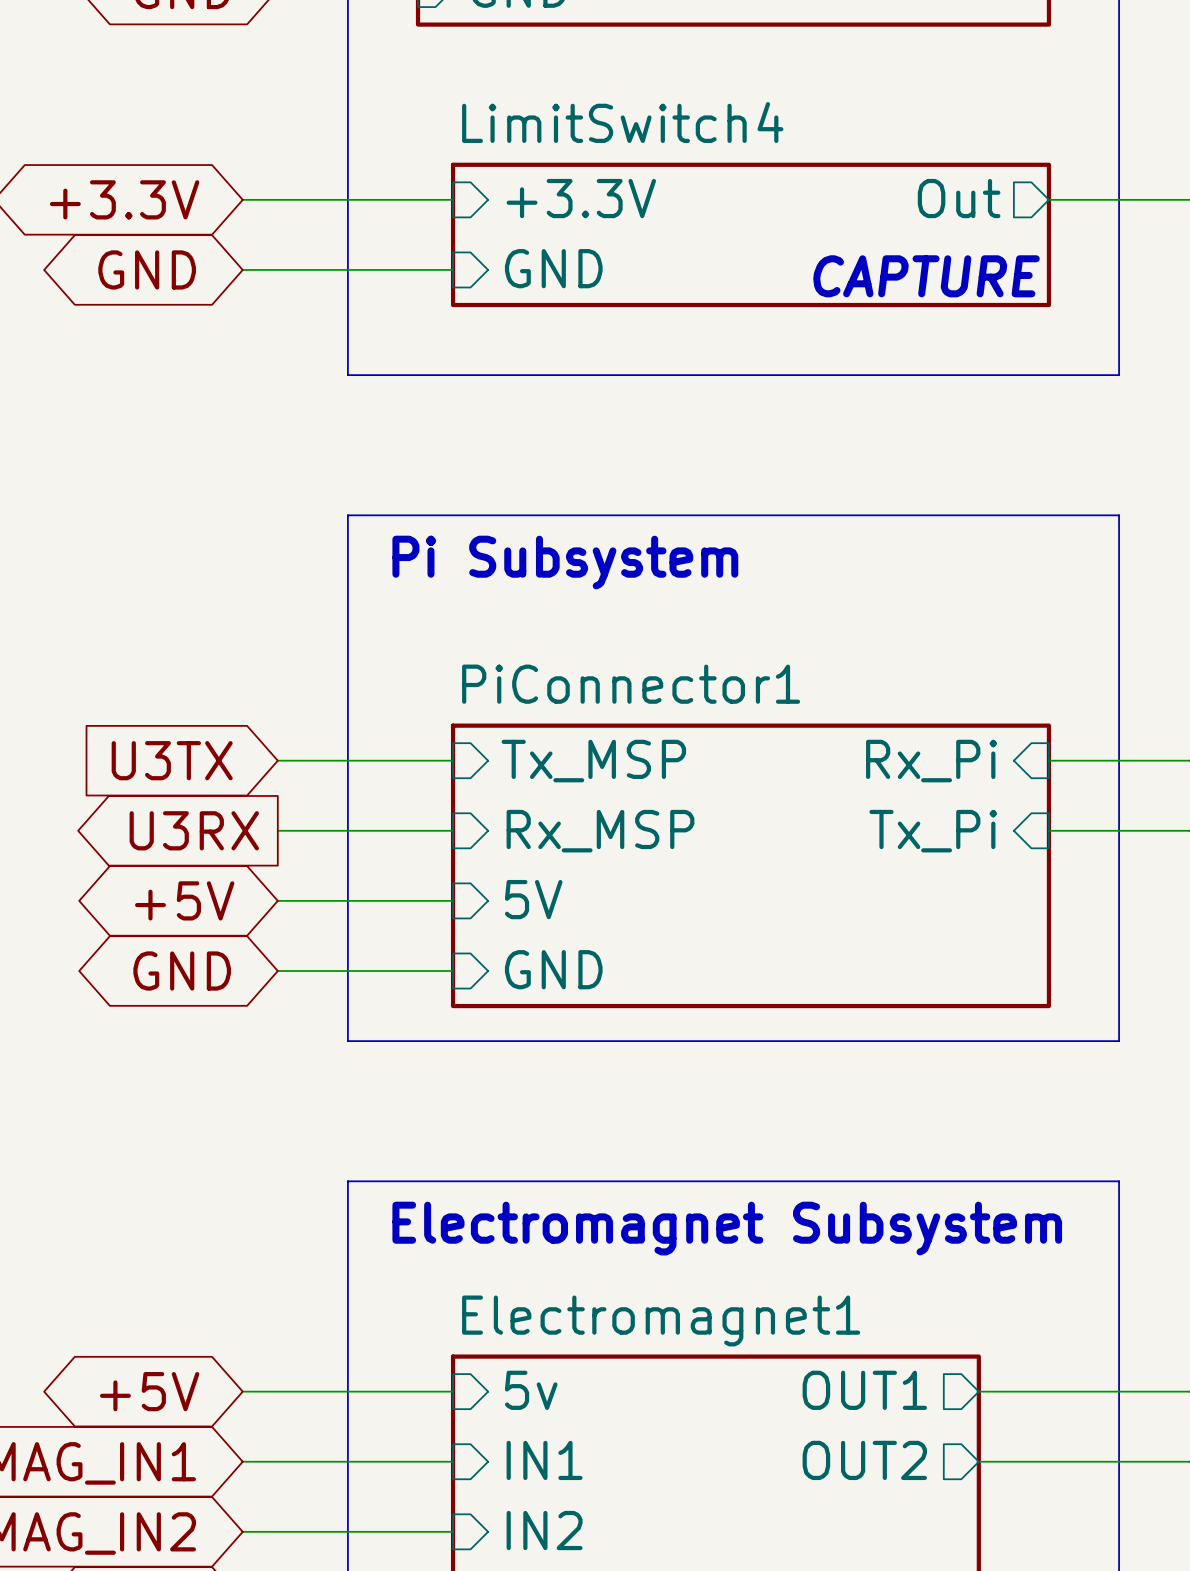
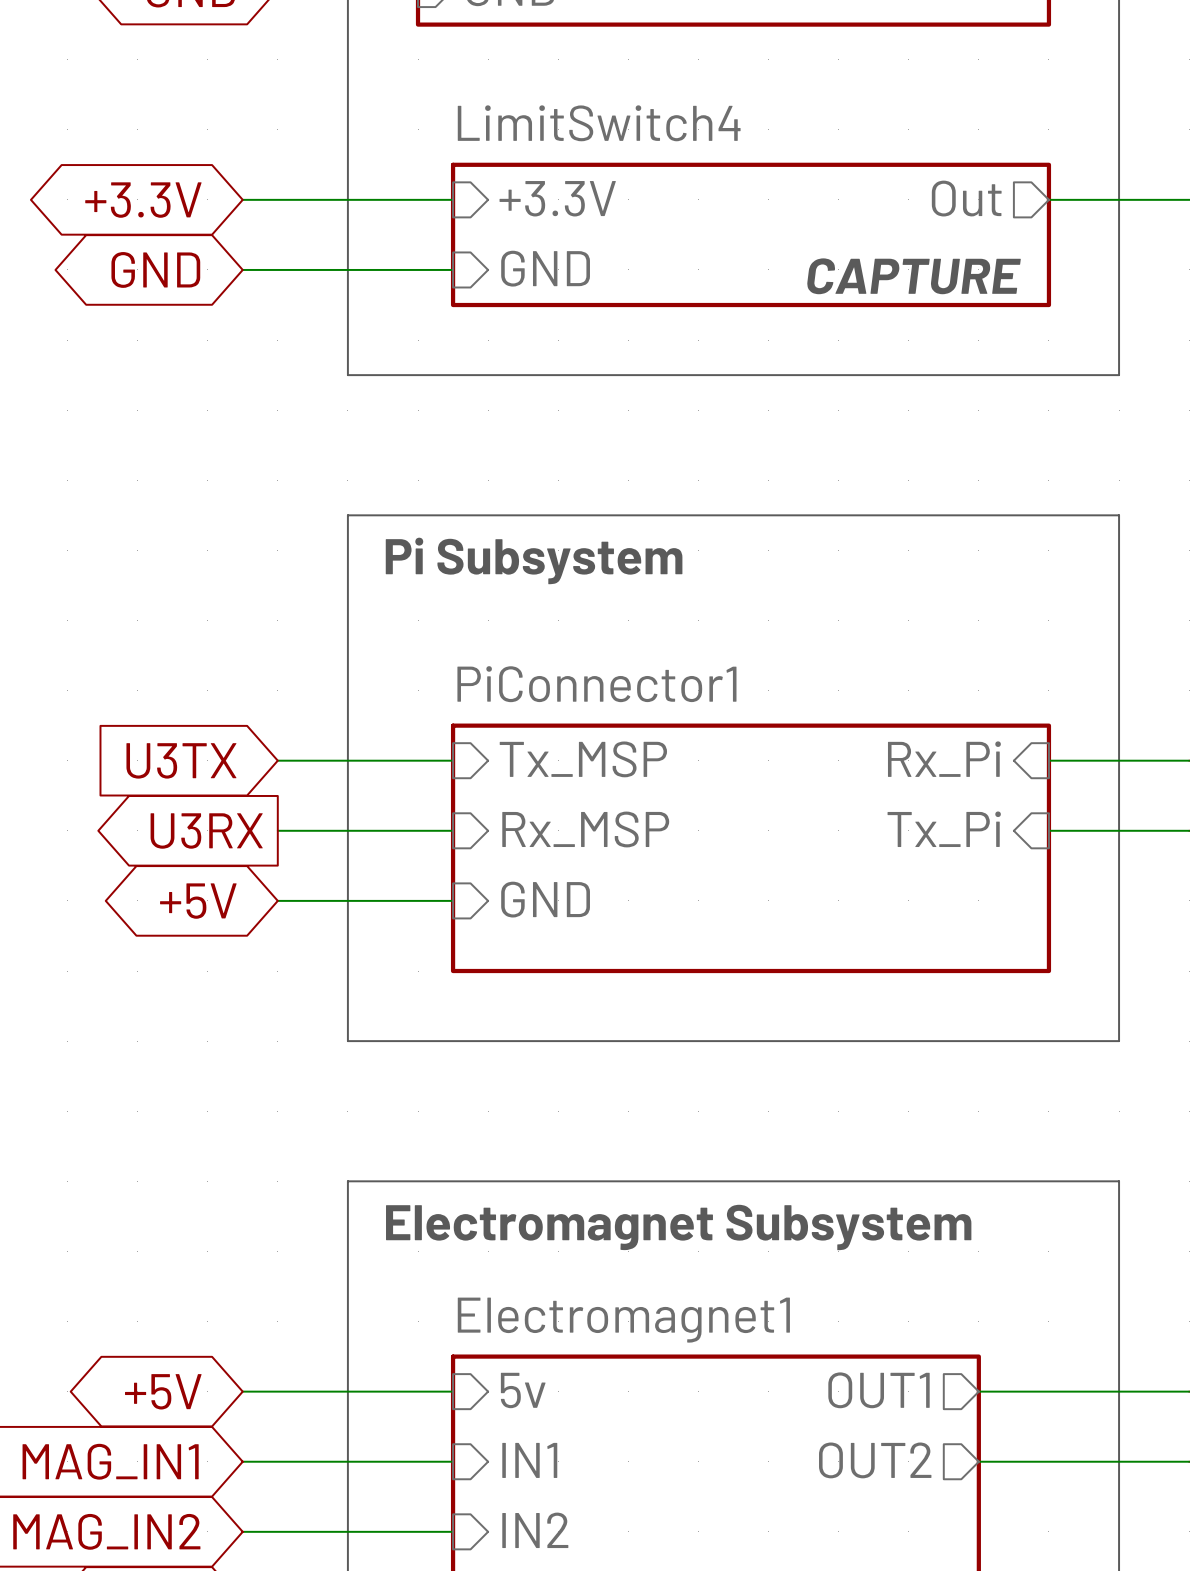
sheet PiConnector1 shape: [450, 723, 1052, 1009] -> [450, 723, 1052, 974]
sheet pin: 5V (533, 899) -> GND (545, 899)
sheet pin: GND (553, 969) -> none
global label: GND (182, 971) -> none
wire: (277, 971) (453, 971) -> none

